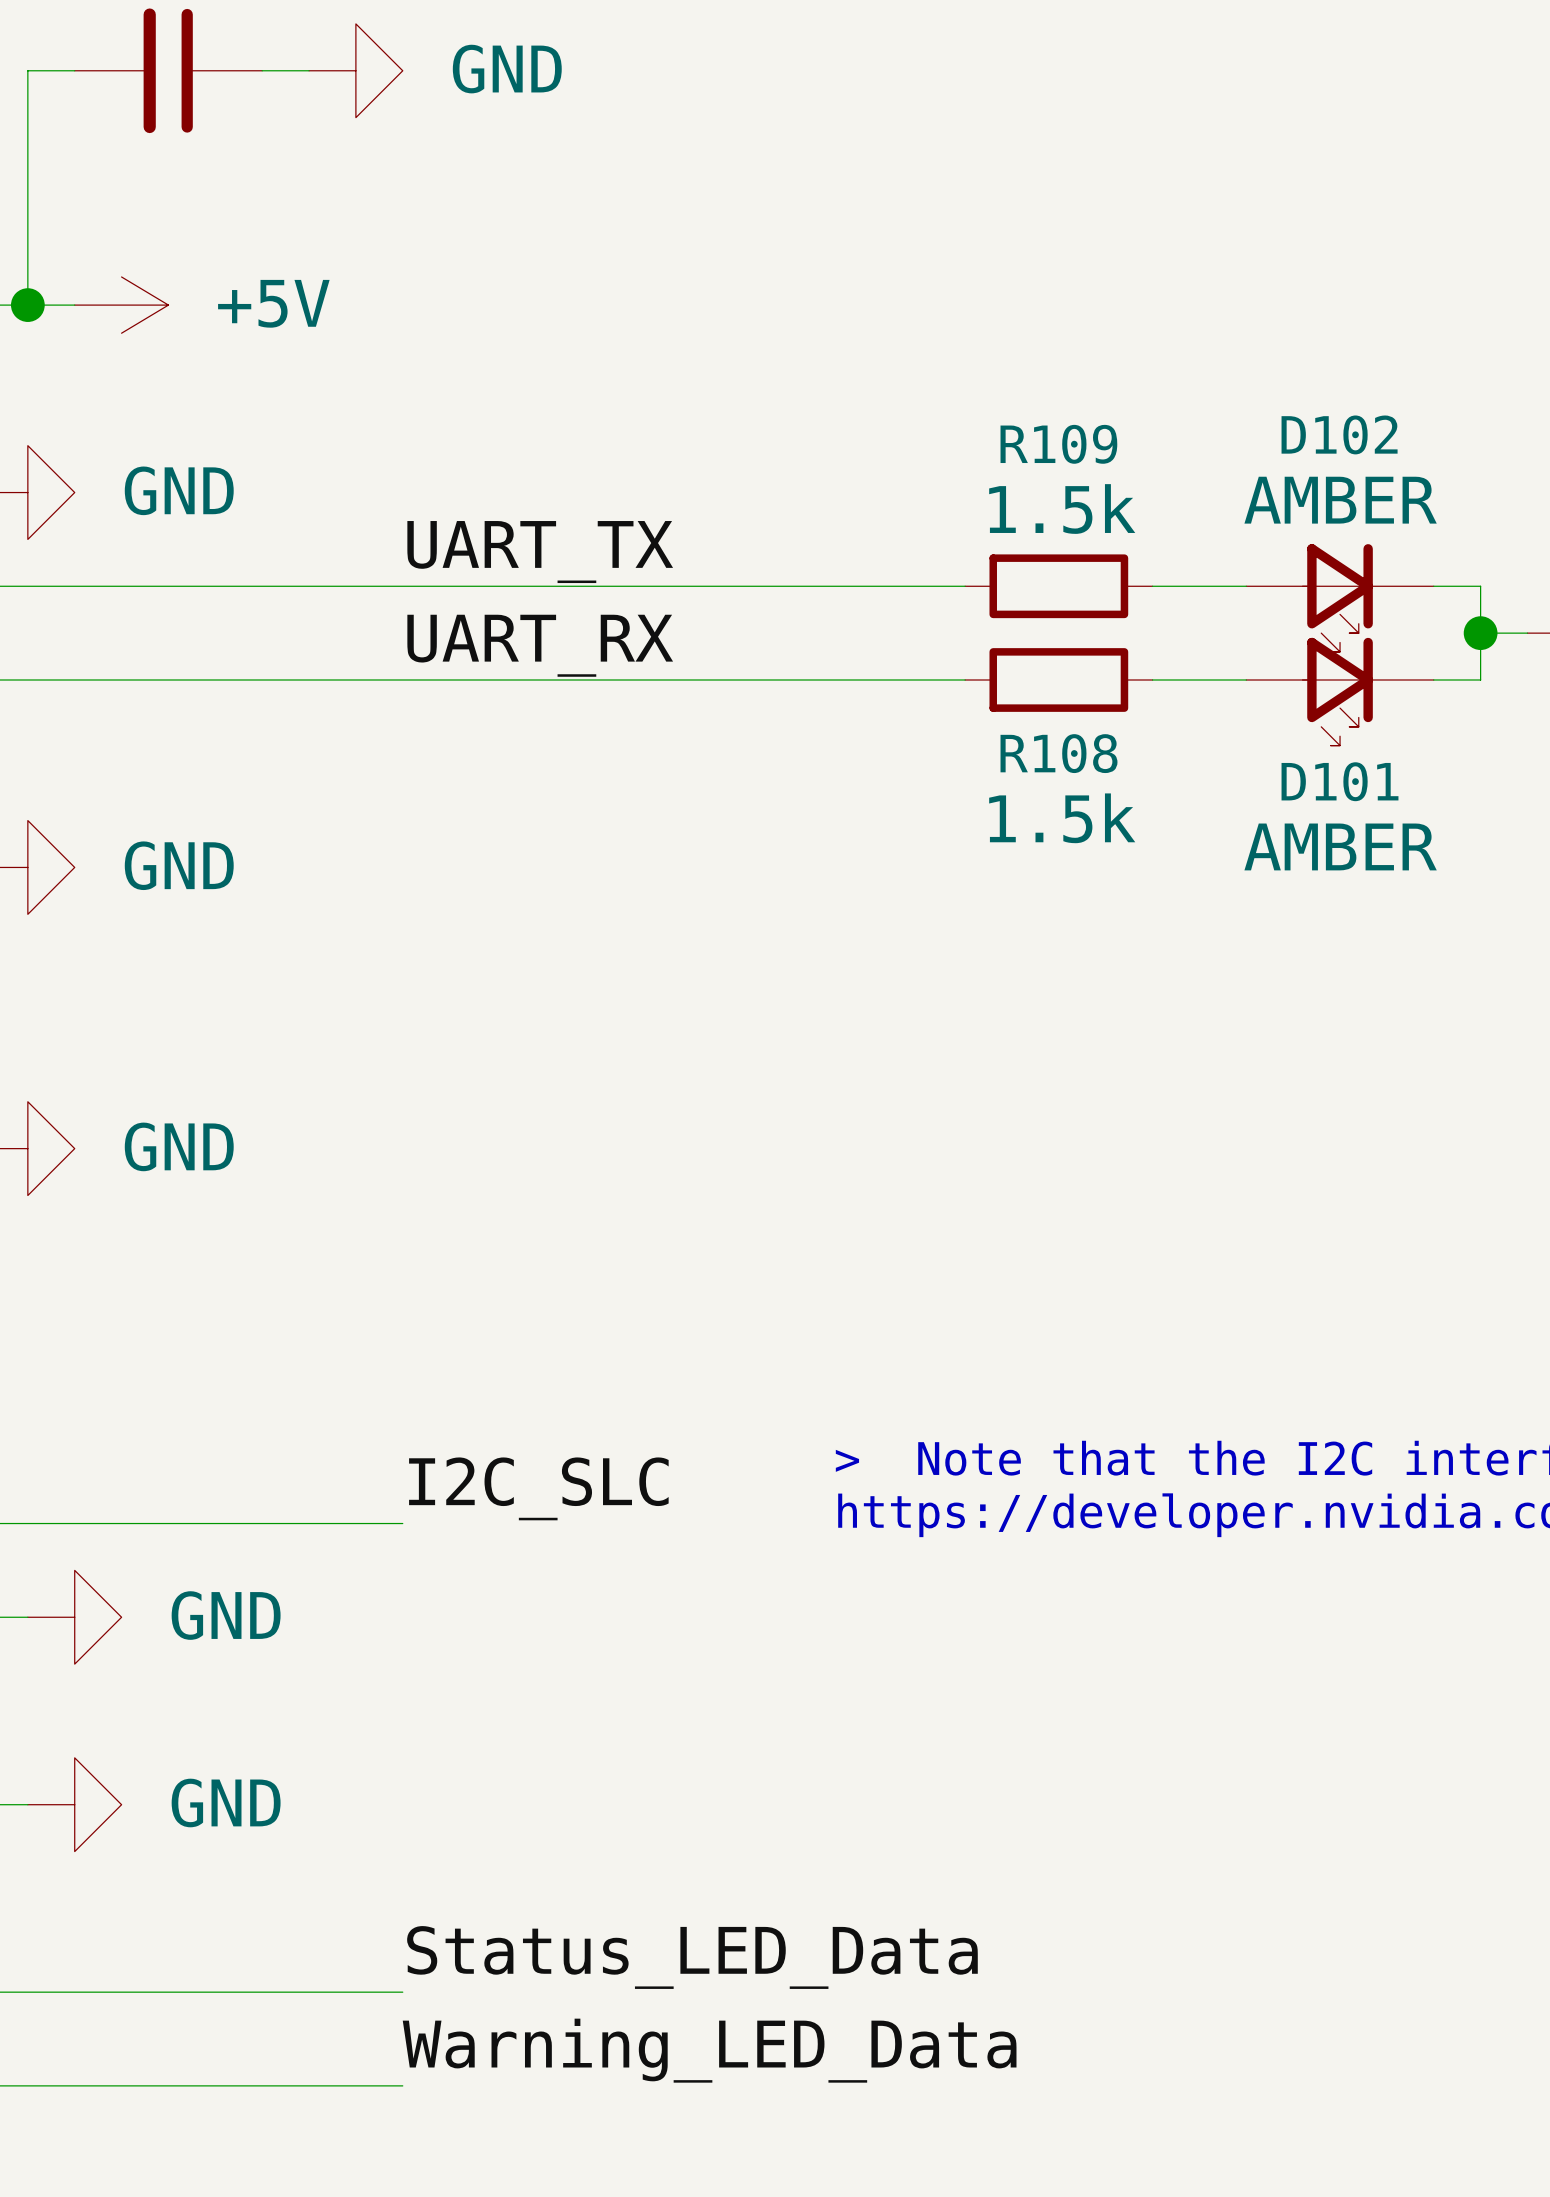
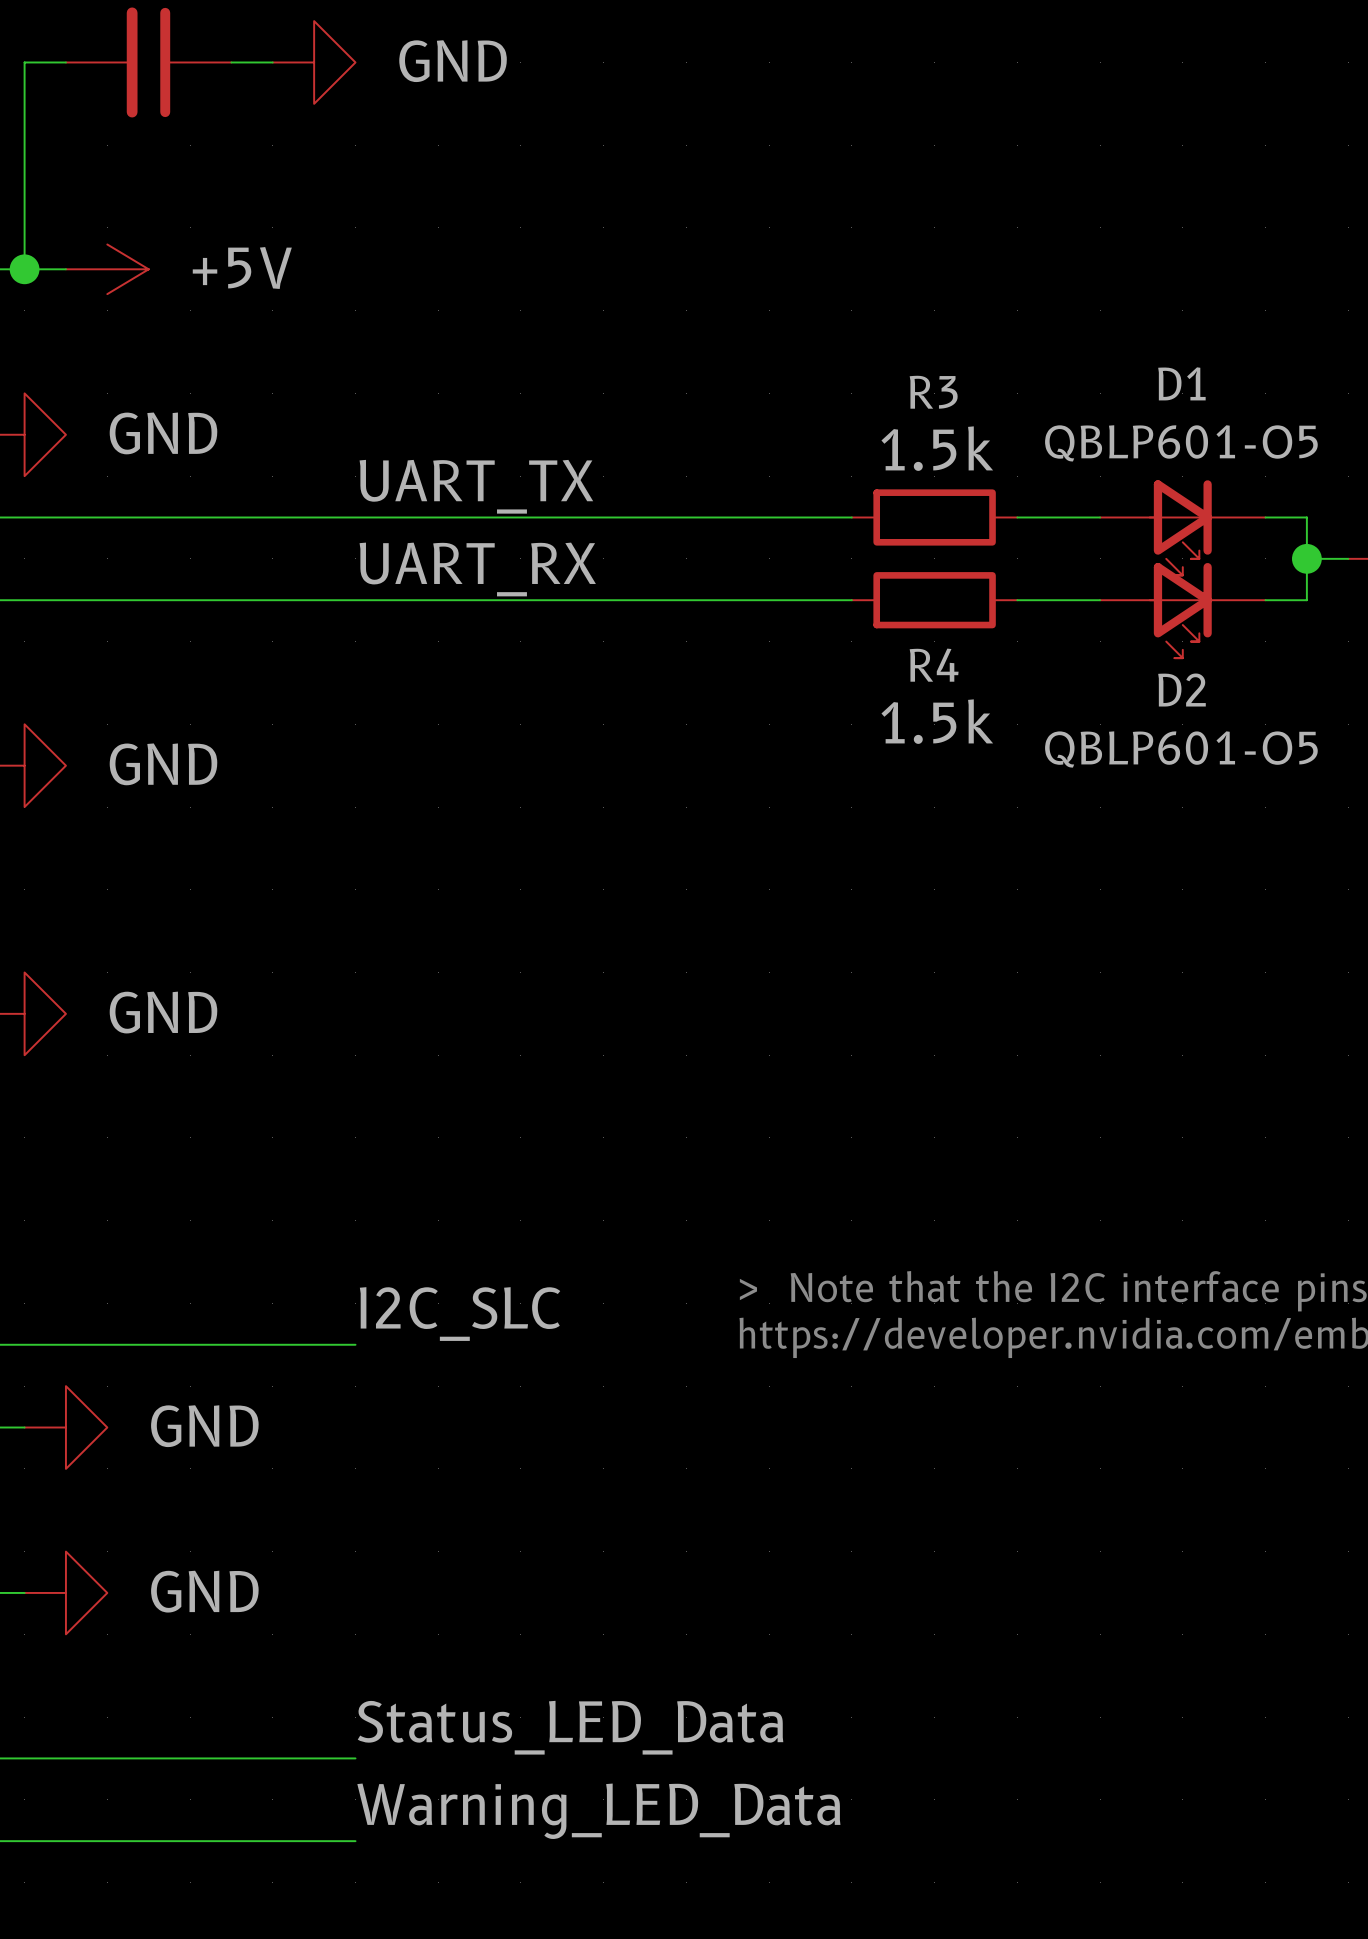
D102 name: D102 (1339, 434) -> D1 (1181, 383)
R109 name: R109 (1058, 444) -> R3 (933, 392)
D102 value: AMBER (1340, 500) -> QBLP601-O5 (1181, 443)
R108 name: R108 (1059, 753) -> R4 (934, 665)
D101 name: D101 (1340, 781) -> D2 (1181, 690)
D101 value: AMBER (1340, 846) -> QBLP601-O5 (1181, 749)

